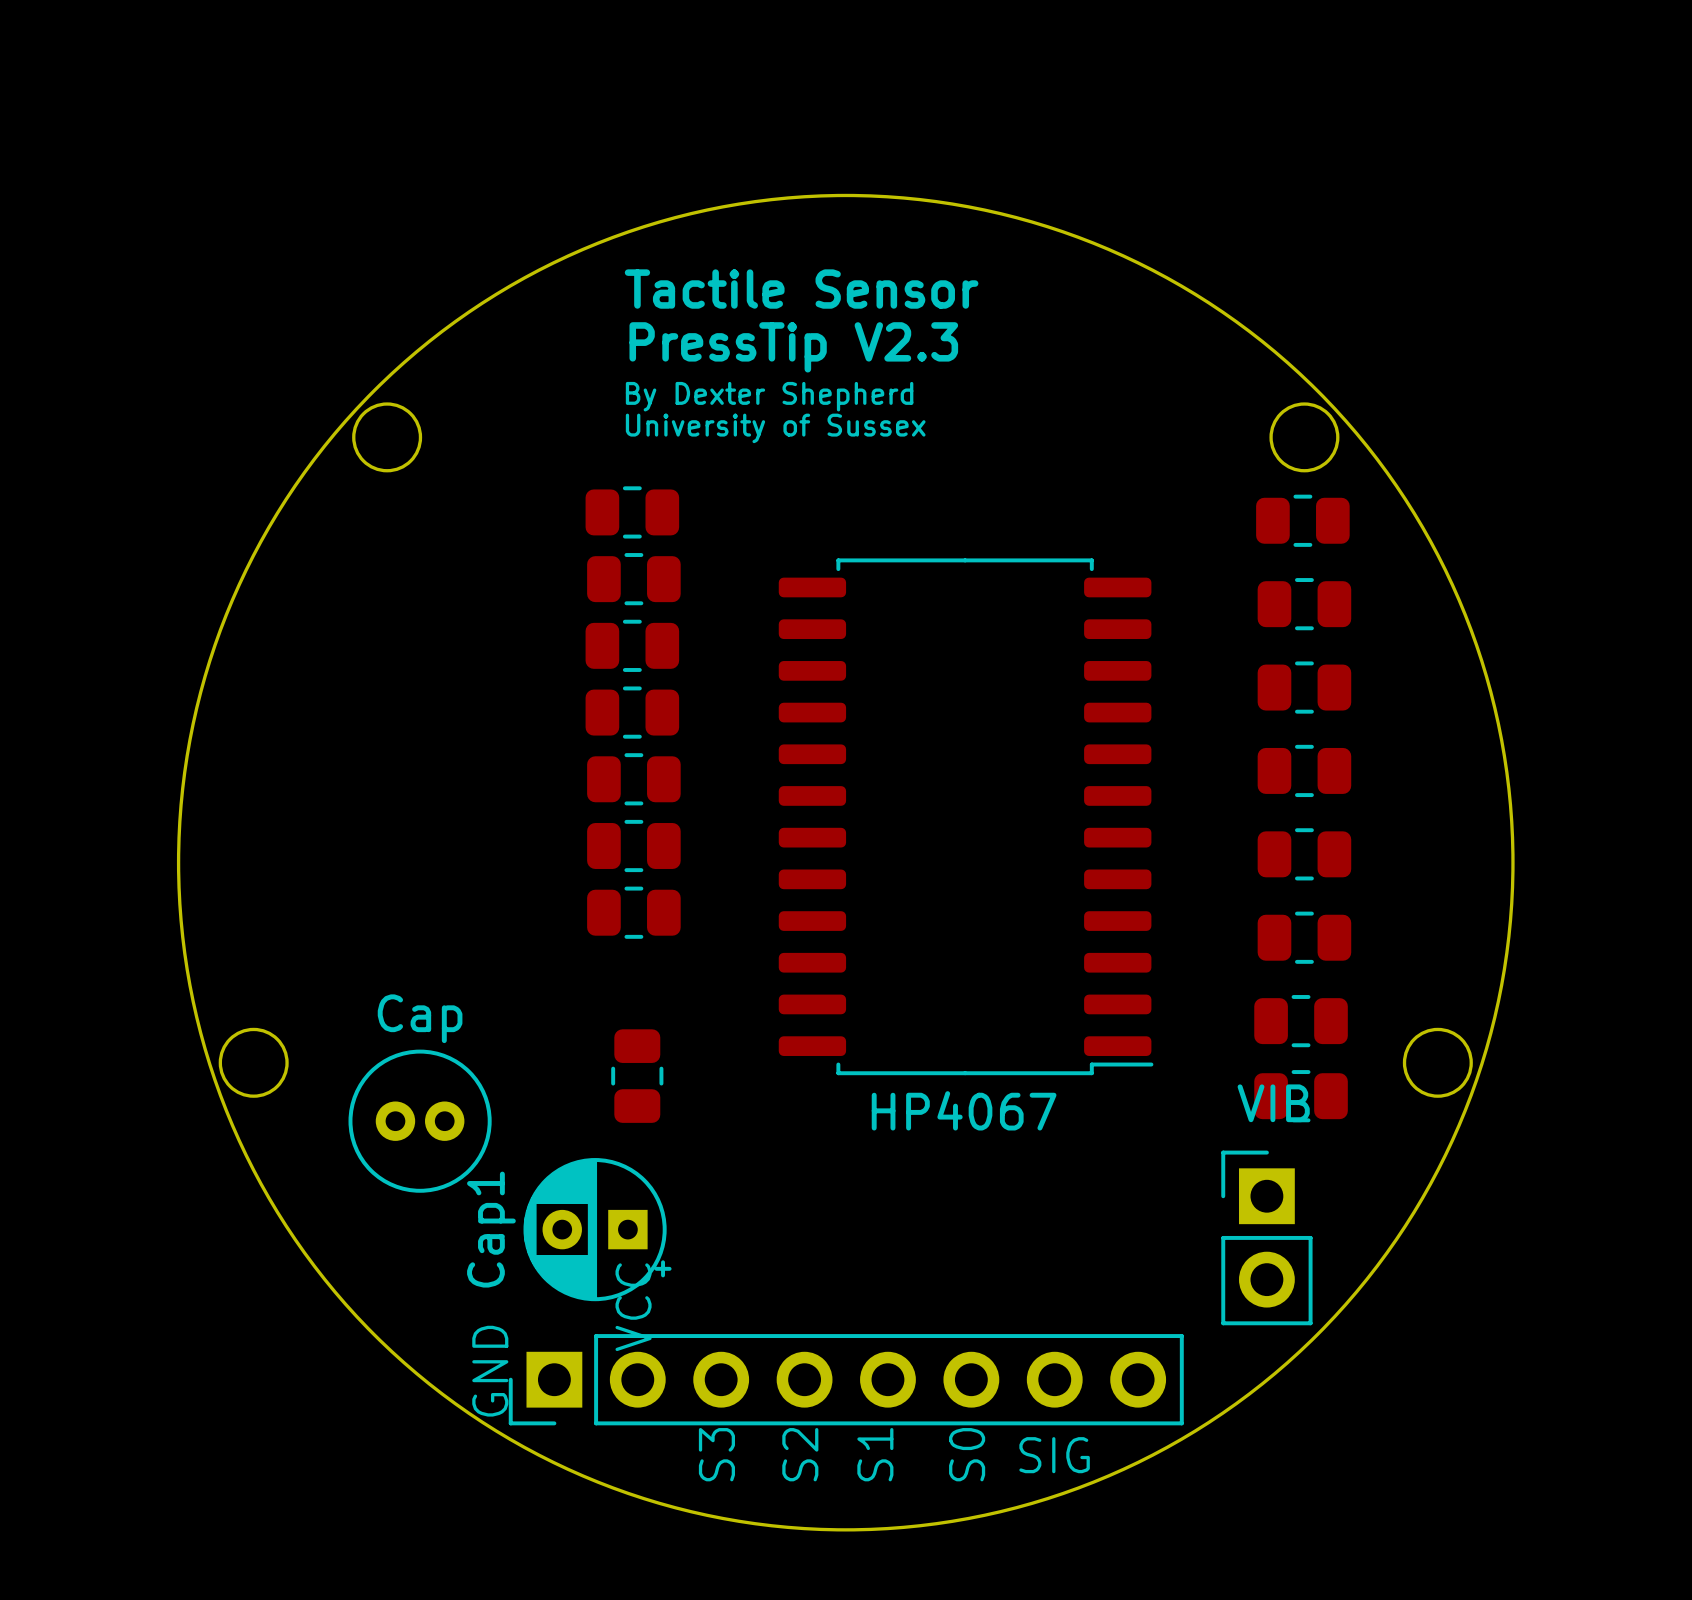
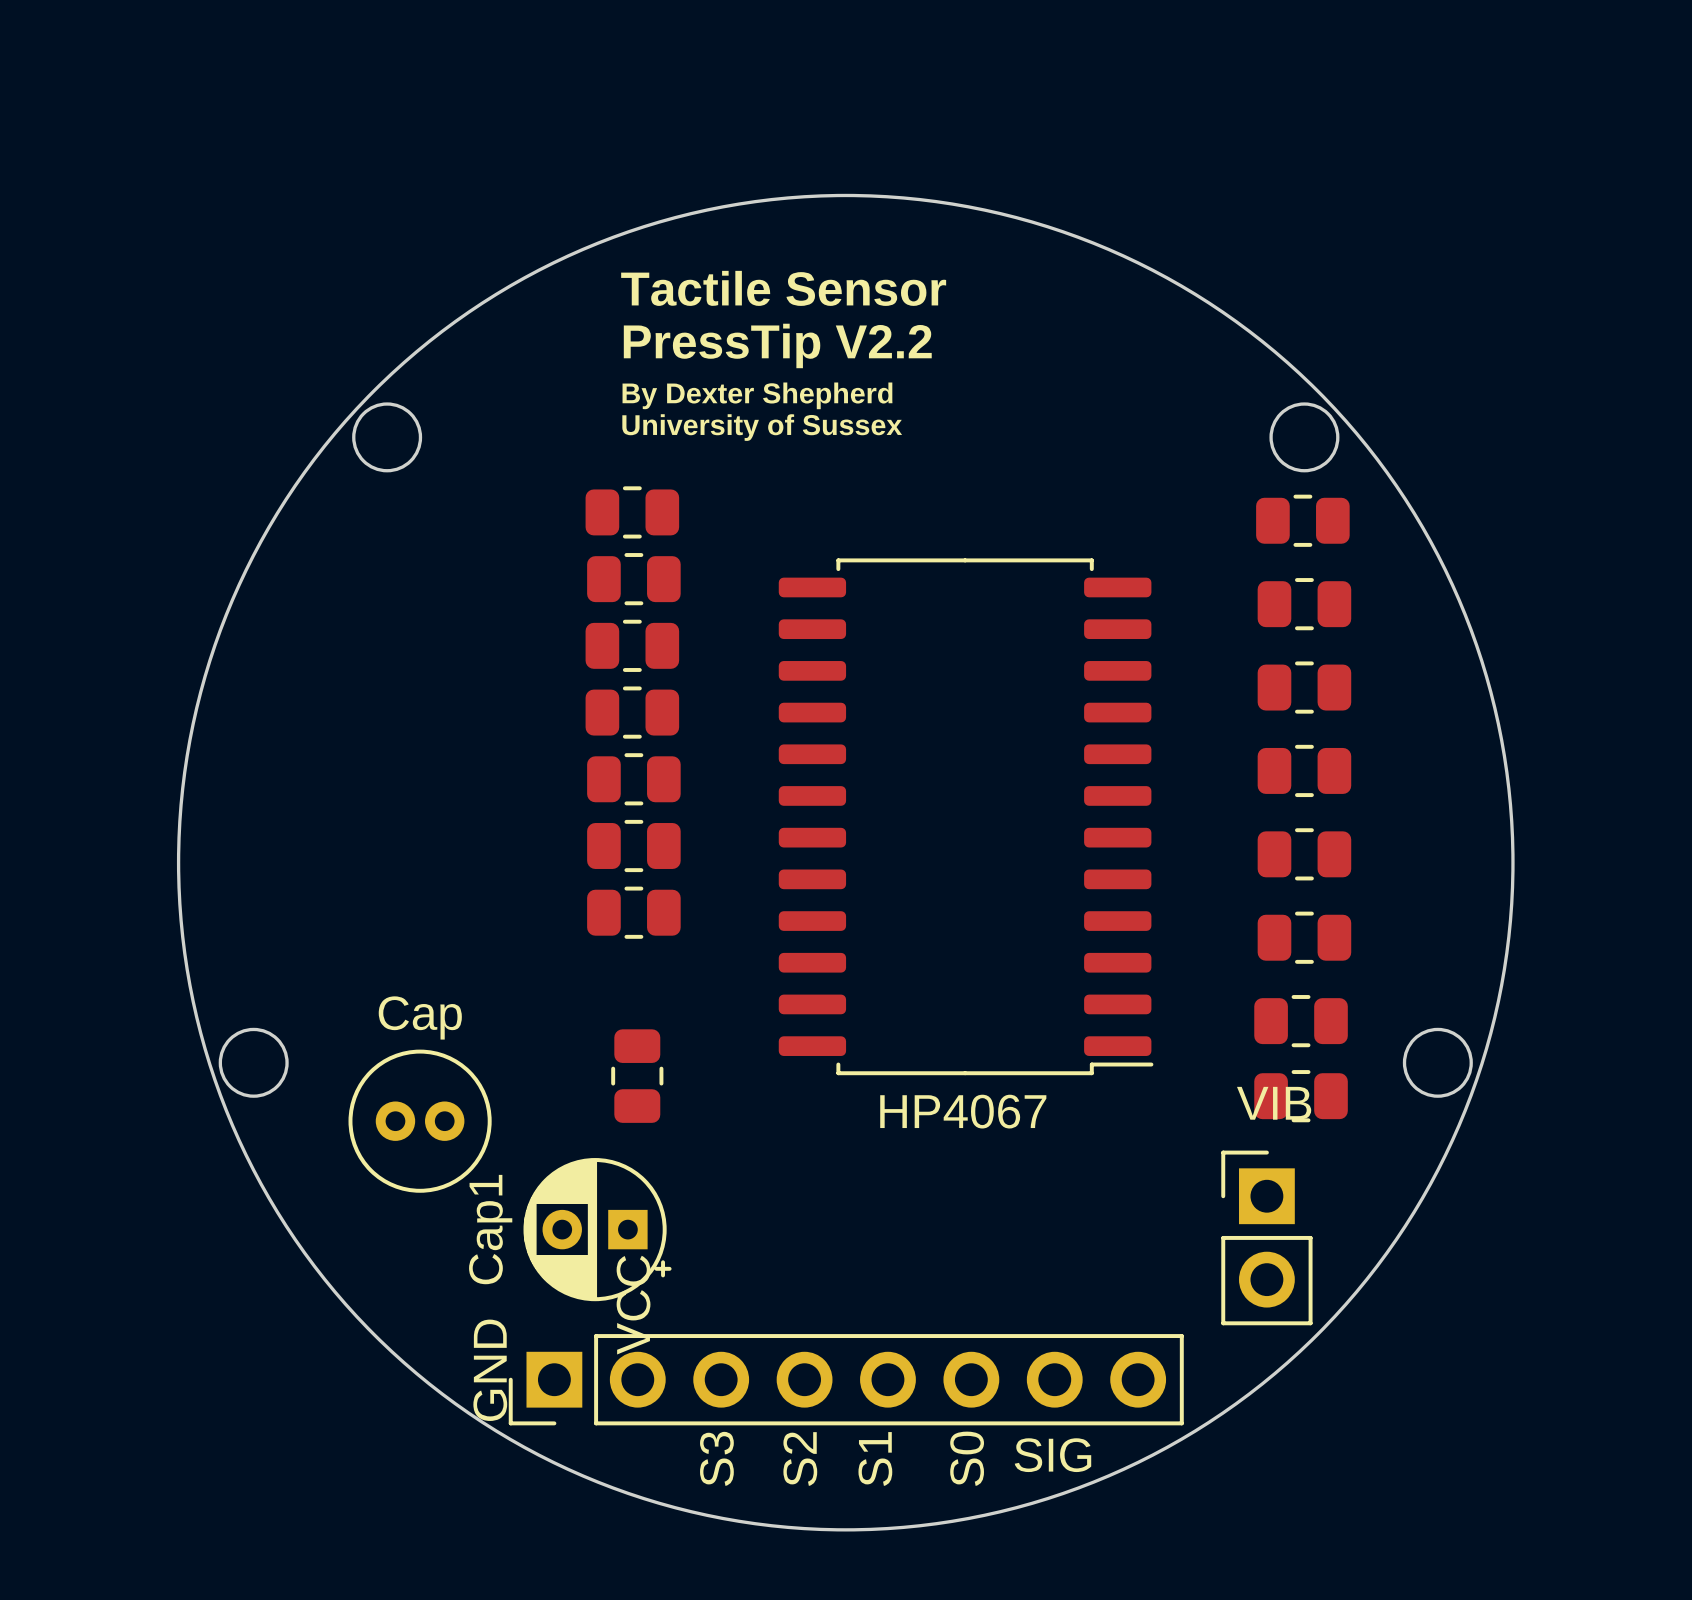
text: PressTip V2.3 (793, 347) -> PressTip V2.2 (777, 345)

